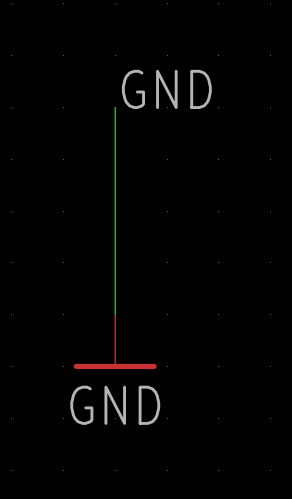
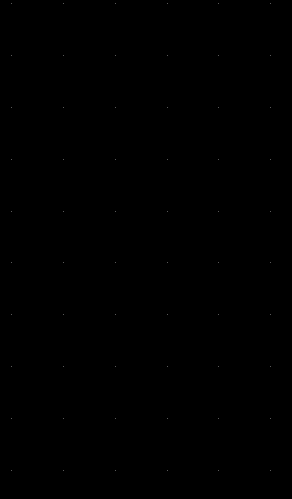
label: GND (166, 89) -> none
wire: (115, 107) (115, 314) -> none
power symbol: GND (115, 341) -> none

